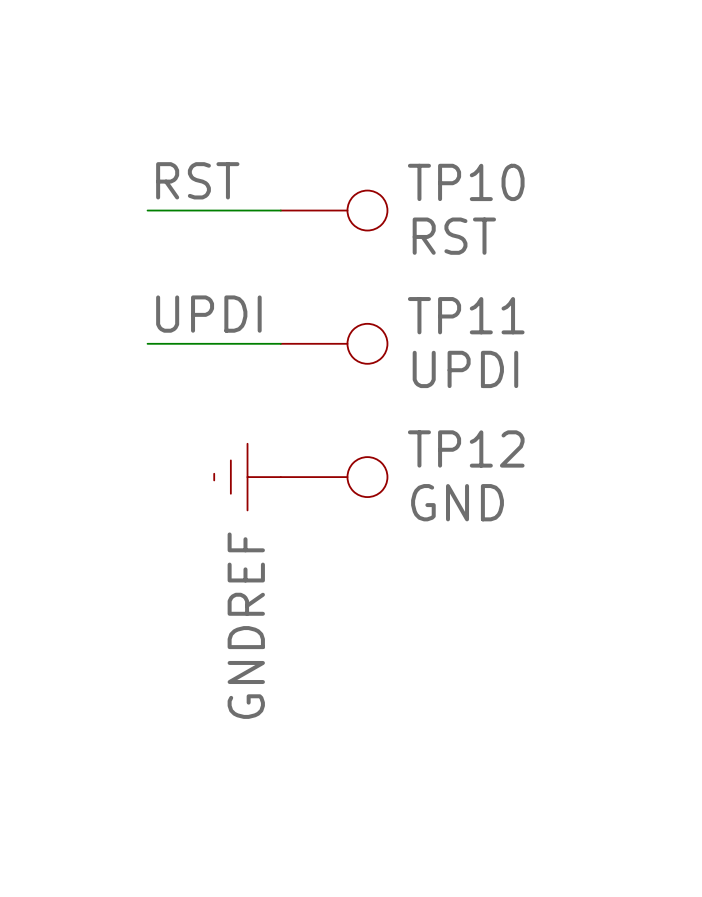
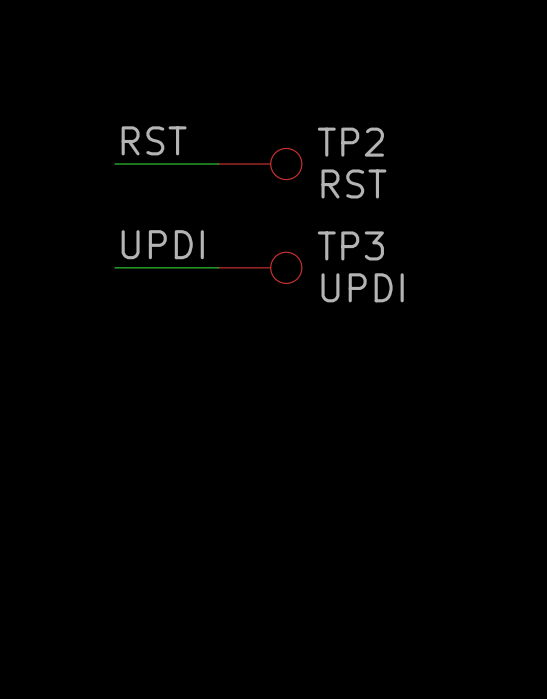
TP10 name: TP10 (466, 182) -> TP2 (350, 142)
TP11 name: TP11 (466, 315) -> TP3 (350, 245)
power symbol: GNDREF (247, 477) -> none
TP12: GND (334, 477) -> none

